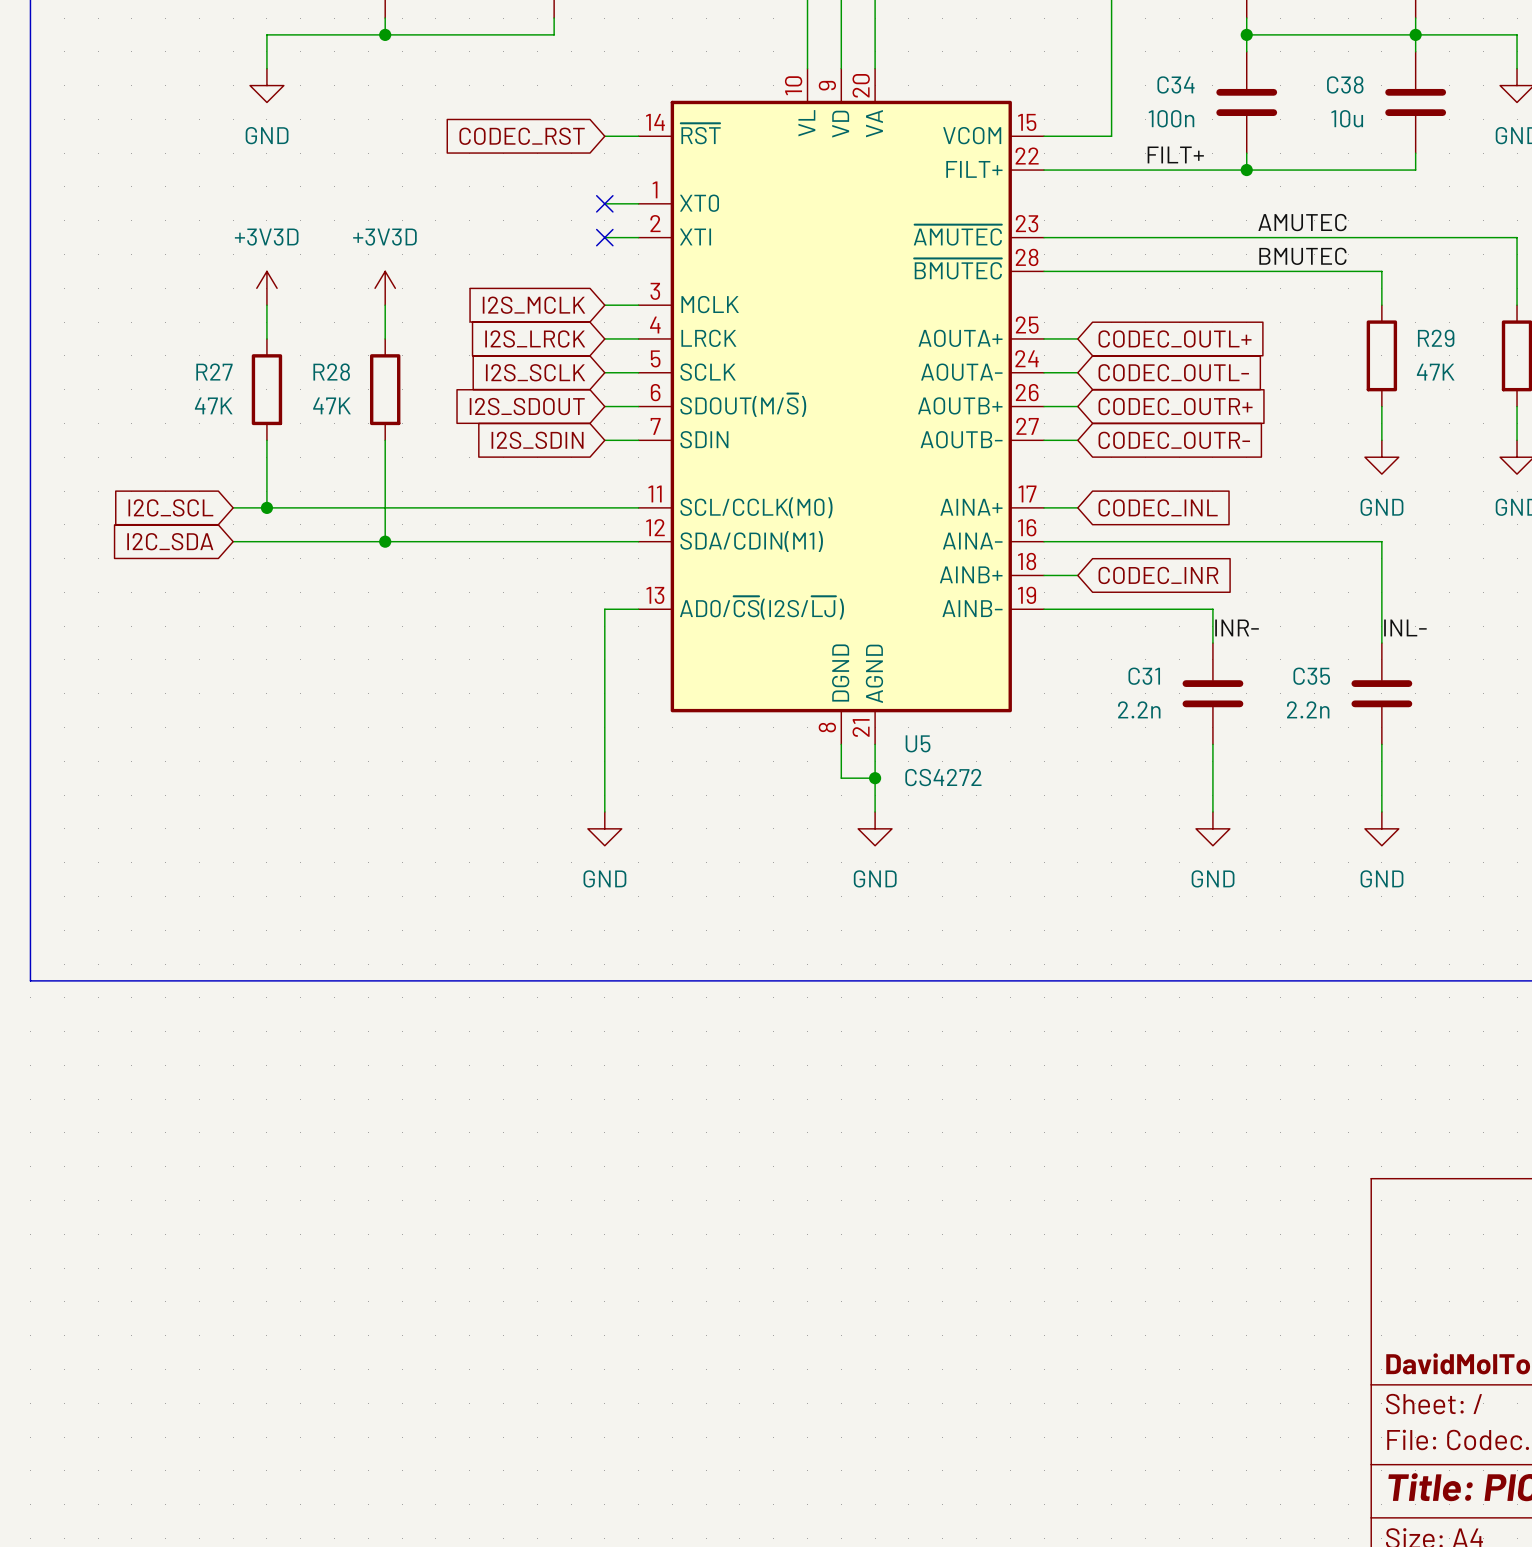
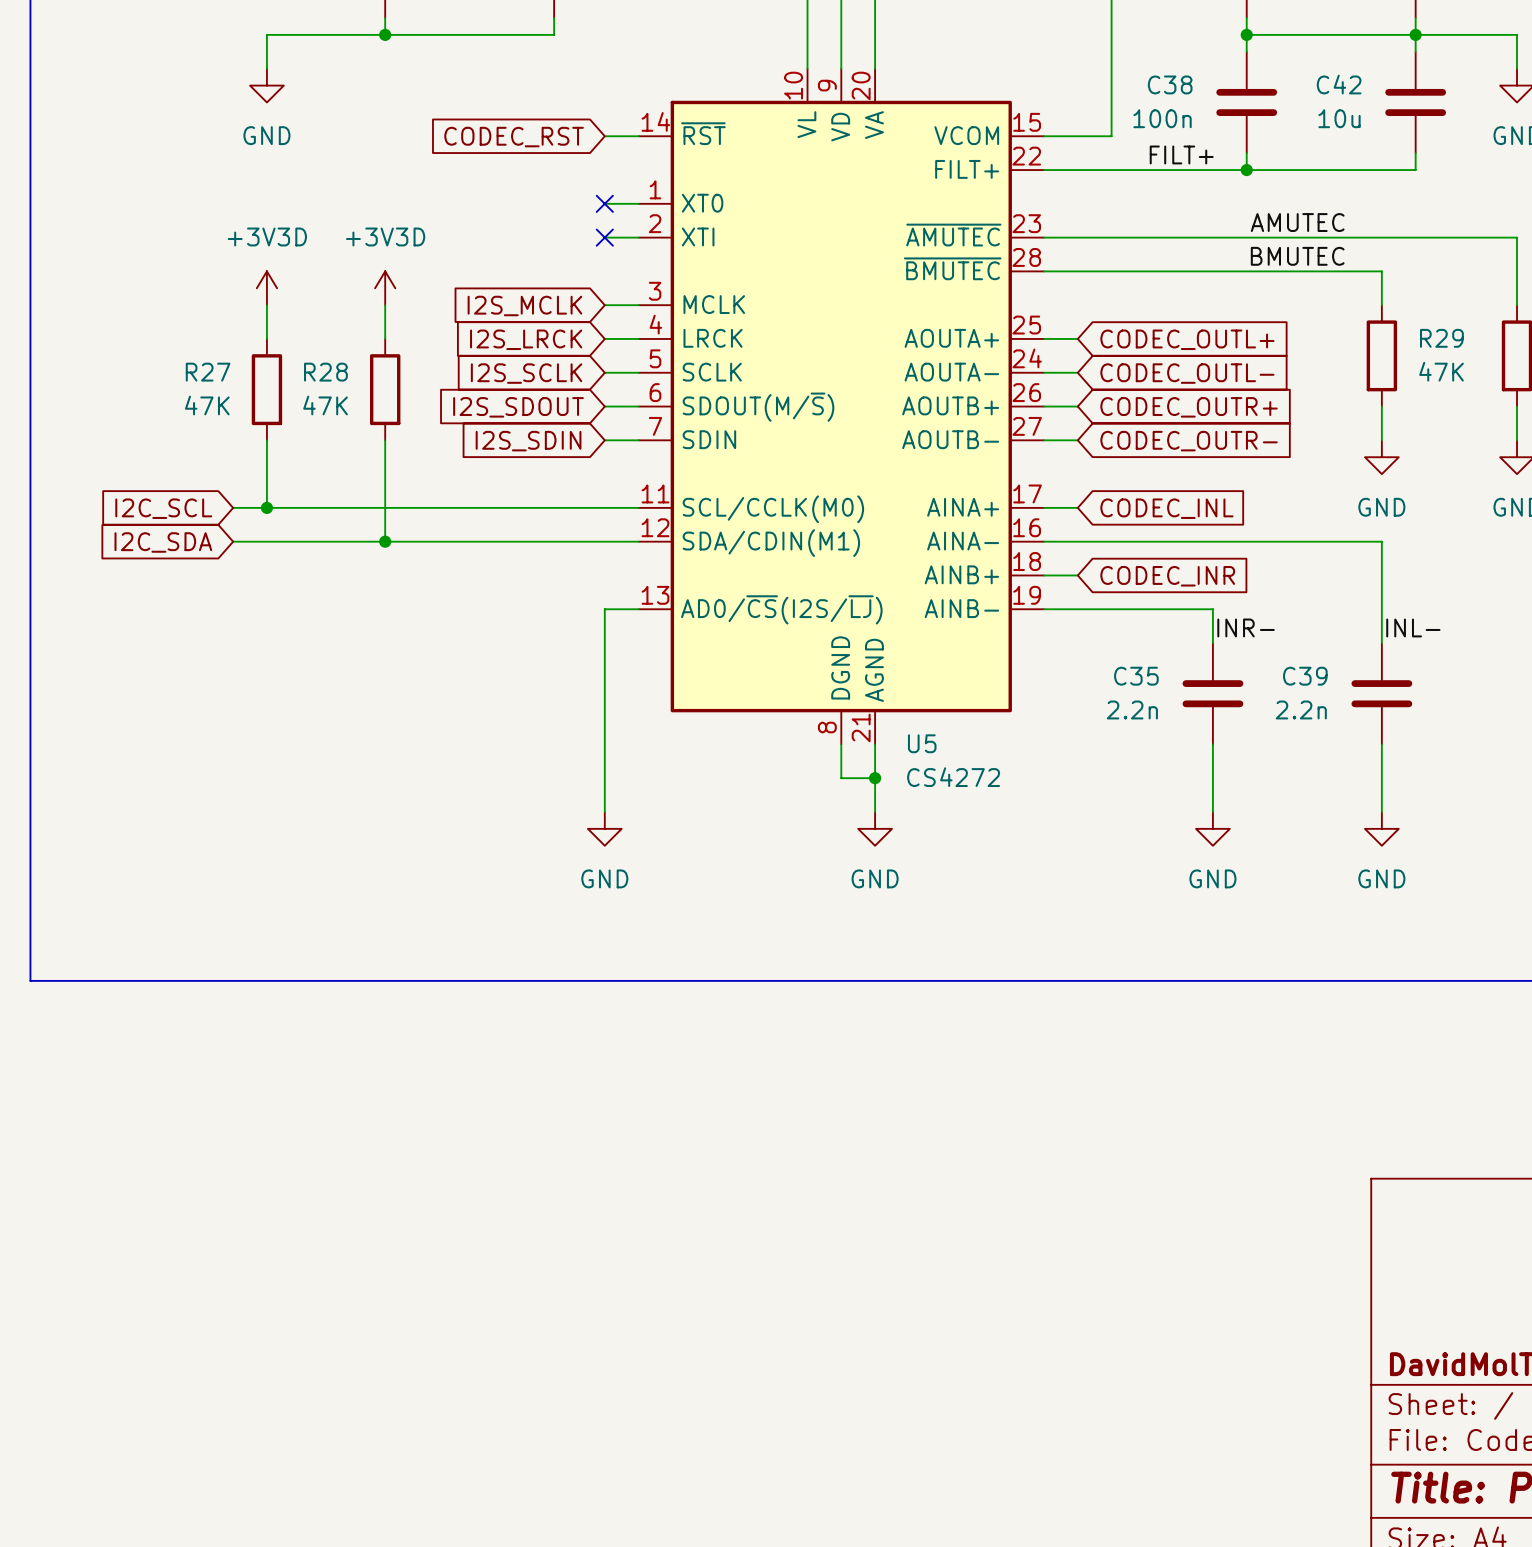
C34 name: C34 (1175, 84) -> C38 (1170, 84)
C38 name: C38 (1345, 84) -> C42 (1339, 84)
C31 name: C31 (1144, 676) -> C35 (1136, 676)
C35 name: C35 (1311, 676) -> C39 (1305, 676)

